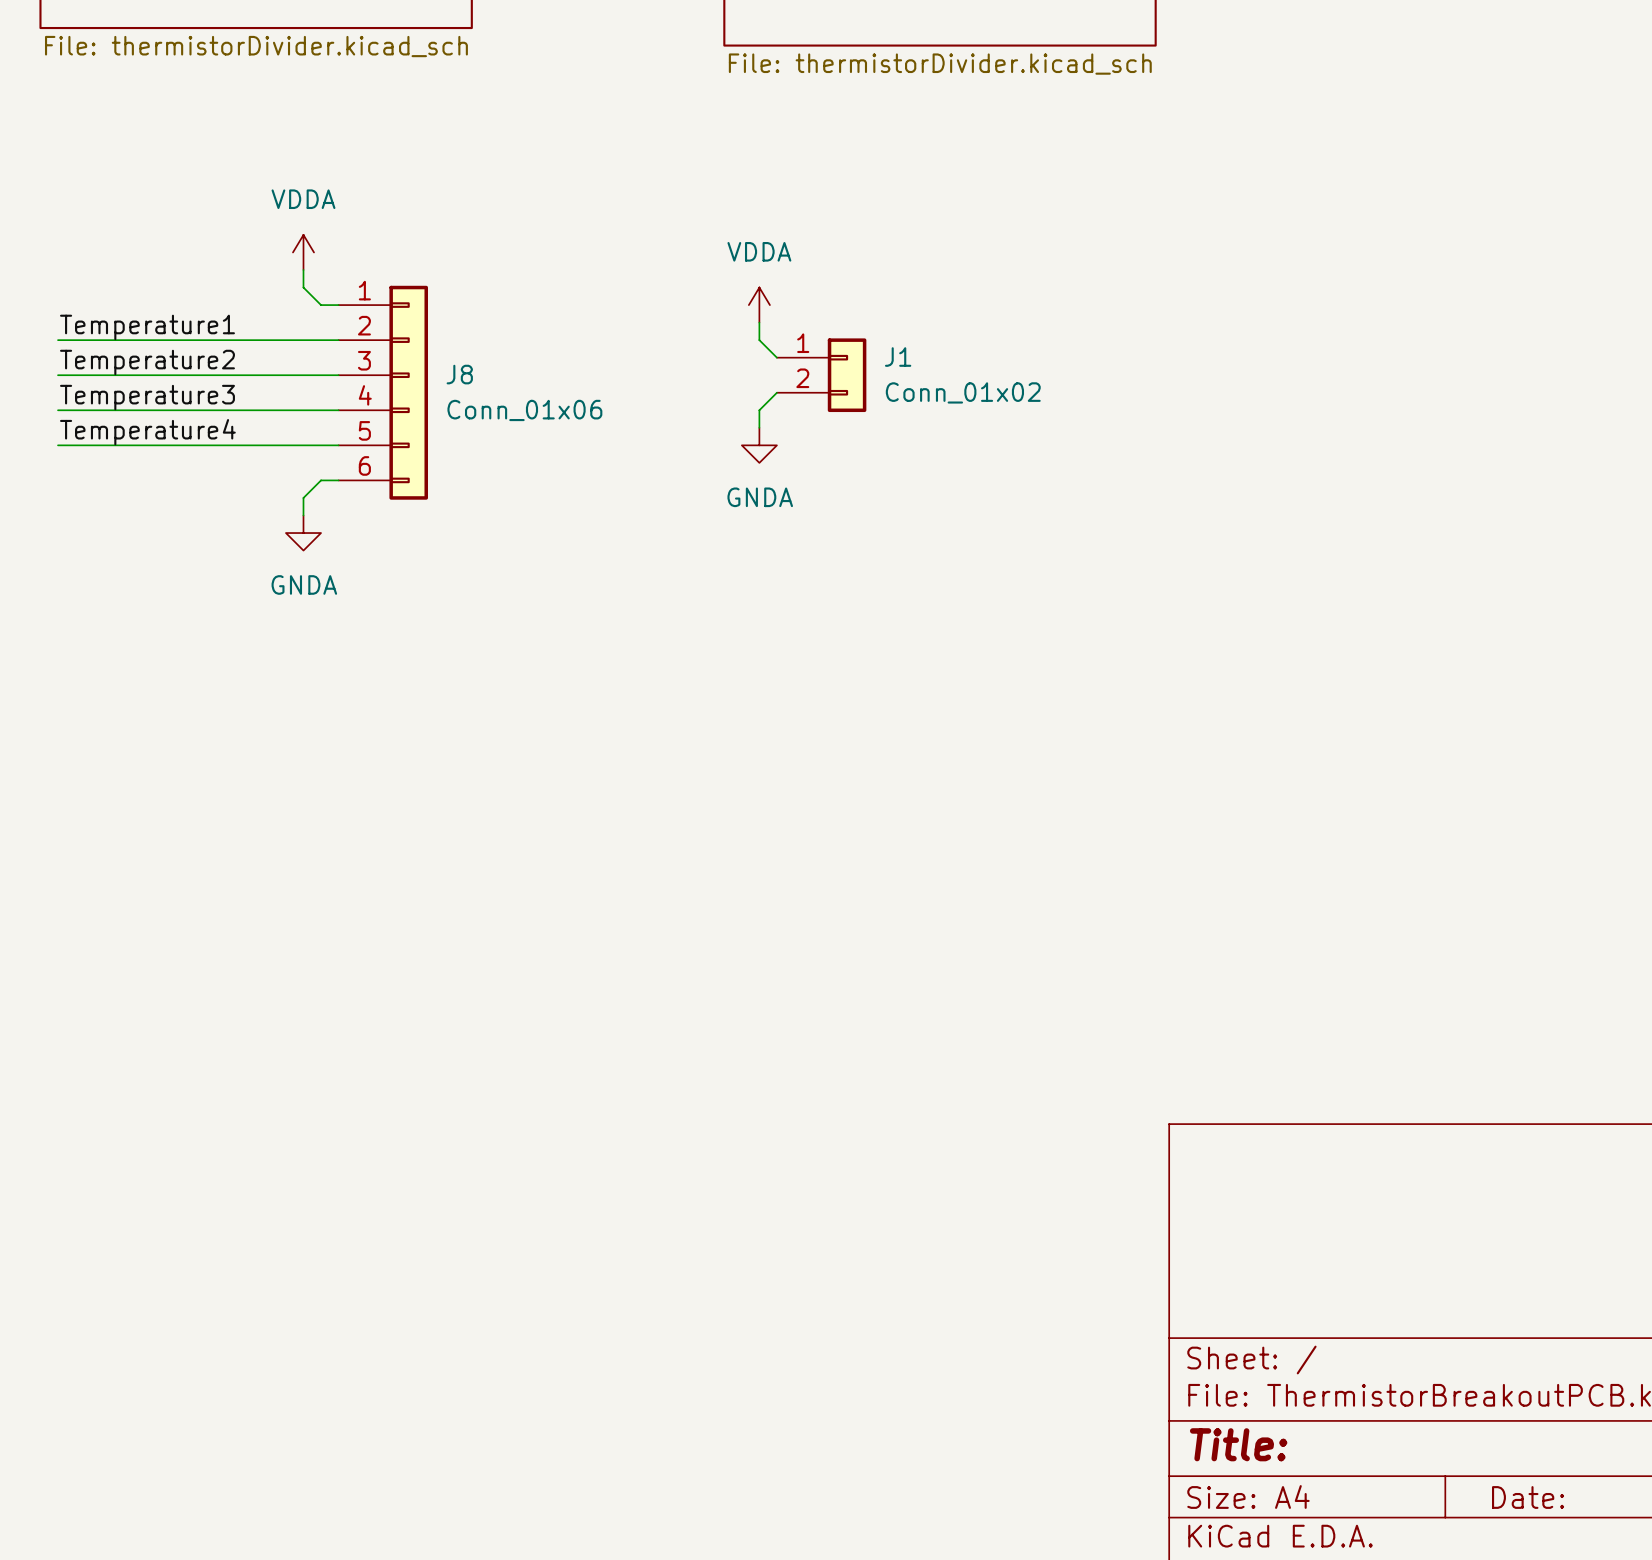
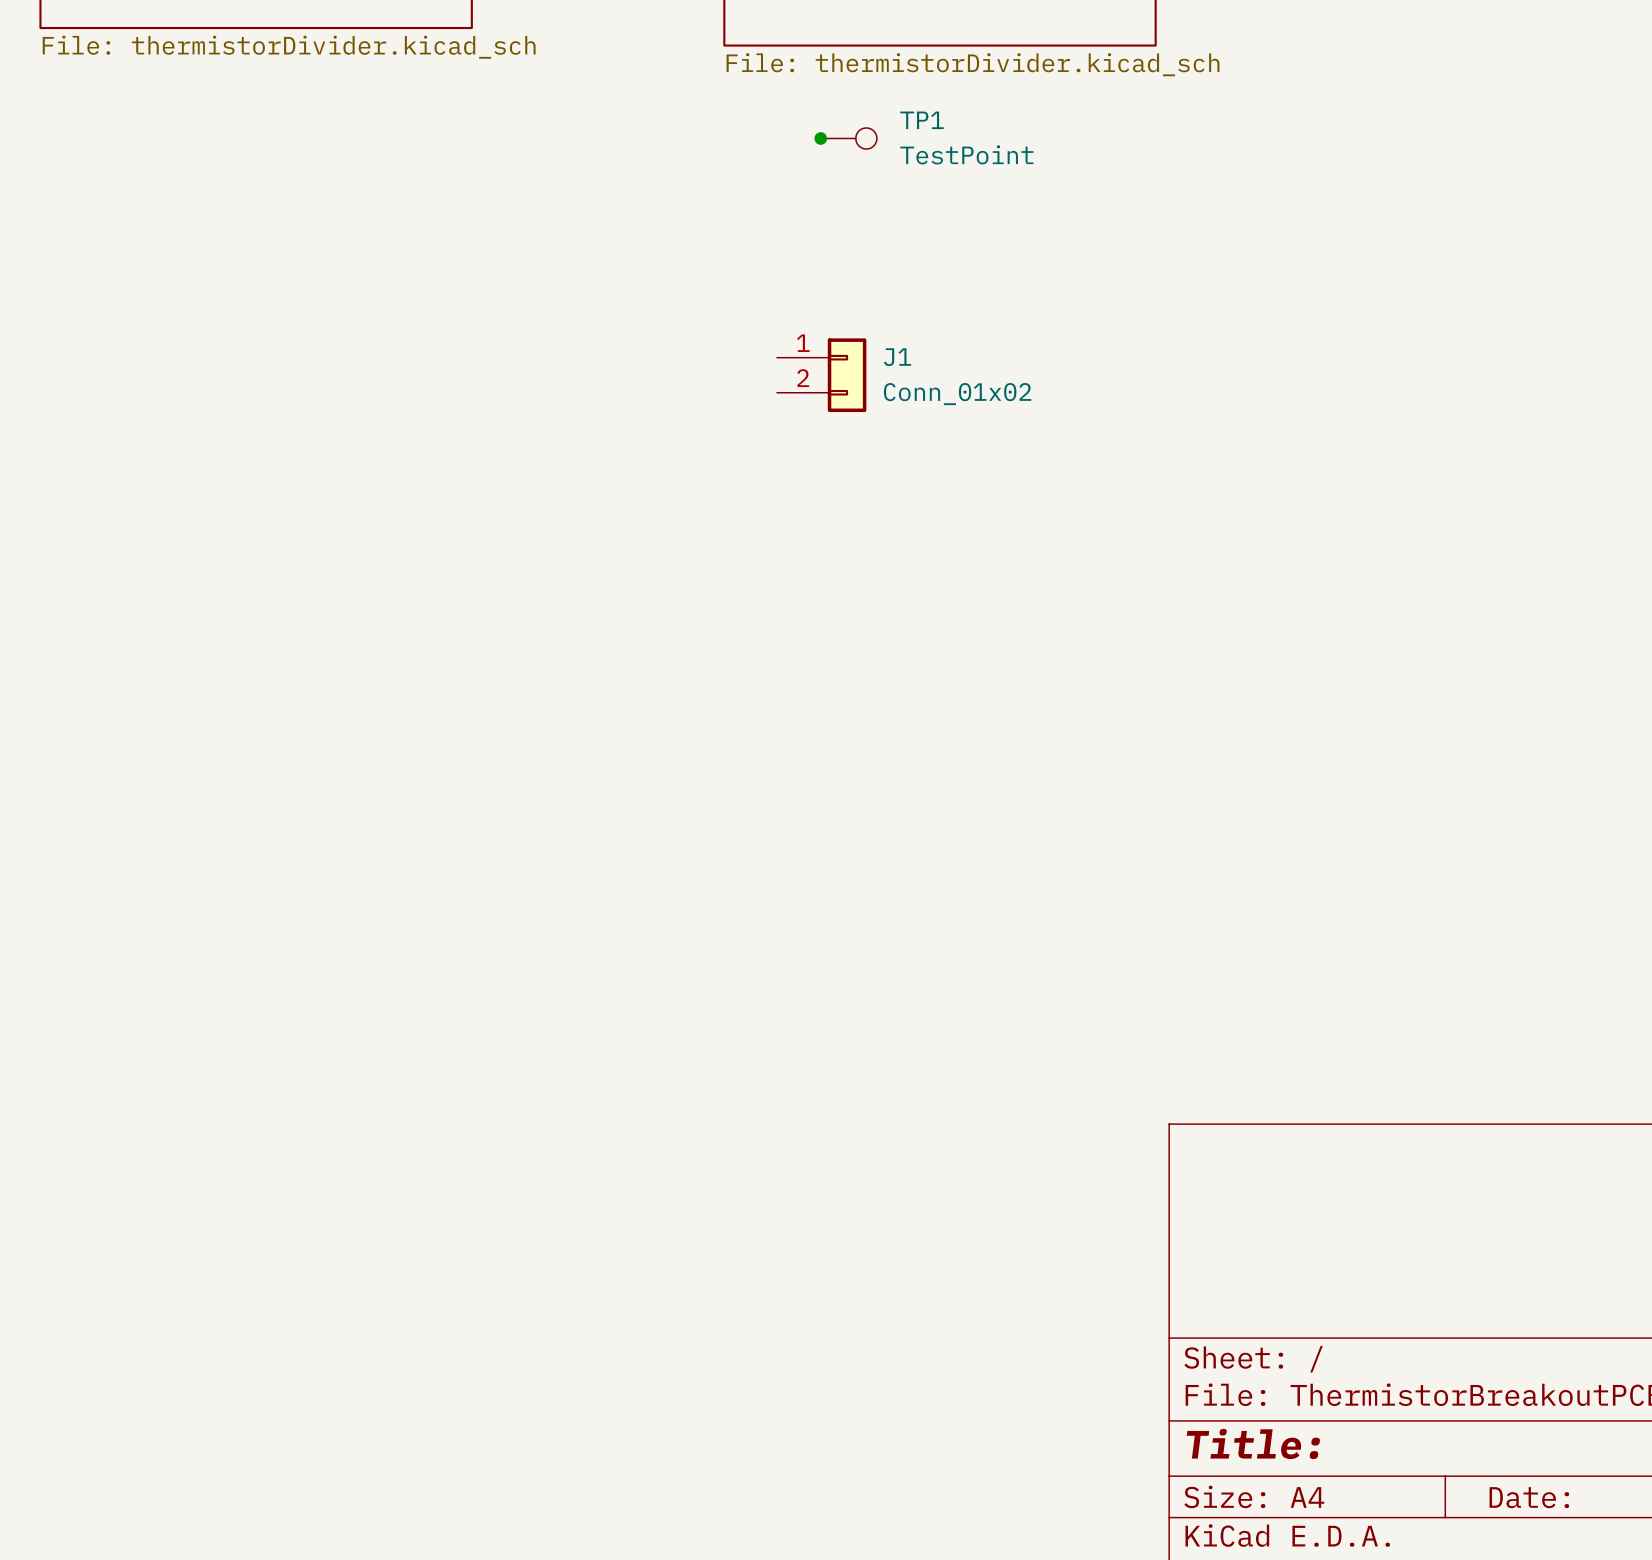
junction: none -> (820, 138)
TP1: none -> TestPoint (848, 138)
power symbol: VDDA (303, 252) -> none
wire: (303, 270) (303, 287) (321, 305) (338, 305) -> none
power symbol: VDDA (759, 305) -> none
wire: (759, 322) (759, 340) (776, 357) -> none
label: Temperature1 (147, 327) -> none
wire: (58, 340) (338, 340) -> none
label: Temperature2 (147, 362) -> none
wire: (58, 375) (338, 375) -> none
J8: Conn_01x06 (383, 392) -> none
wire: (776, 392) (759, 410) (759, 427) -> none
label: Temperature3 (147, 397) -> none
wire: (58, 410) (338, 410) -> none
label: Temperature4 (147, 432) -> none
wire: (58, 445) (338, 445) -> none
power symbol: GNDA (759, 445) -> none
wire: (338, 480) (321, 480) (303, 497) (303, 515) -> none
power symbol: GNDA (303, 533) -> none

